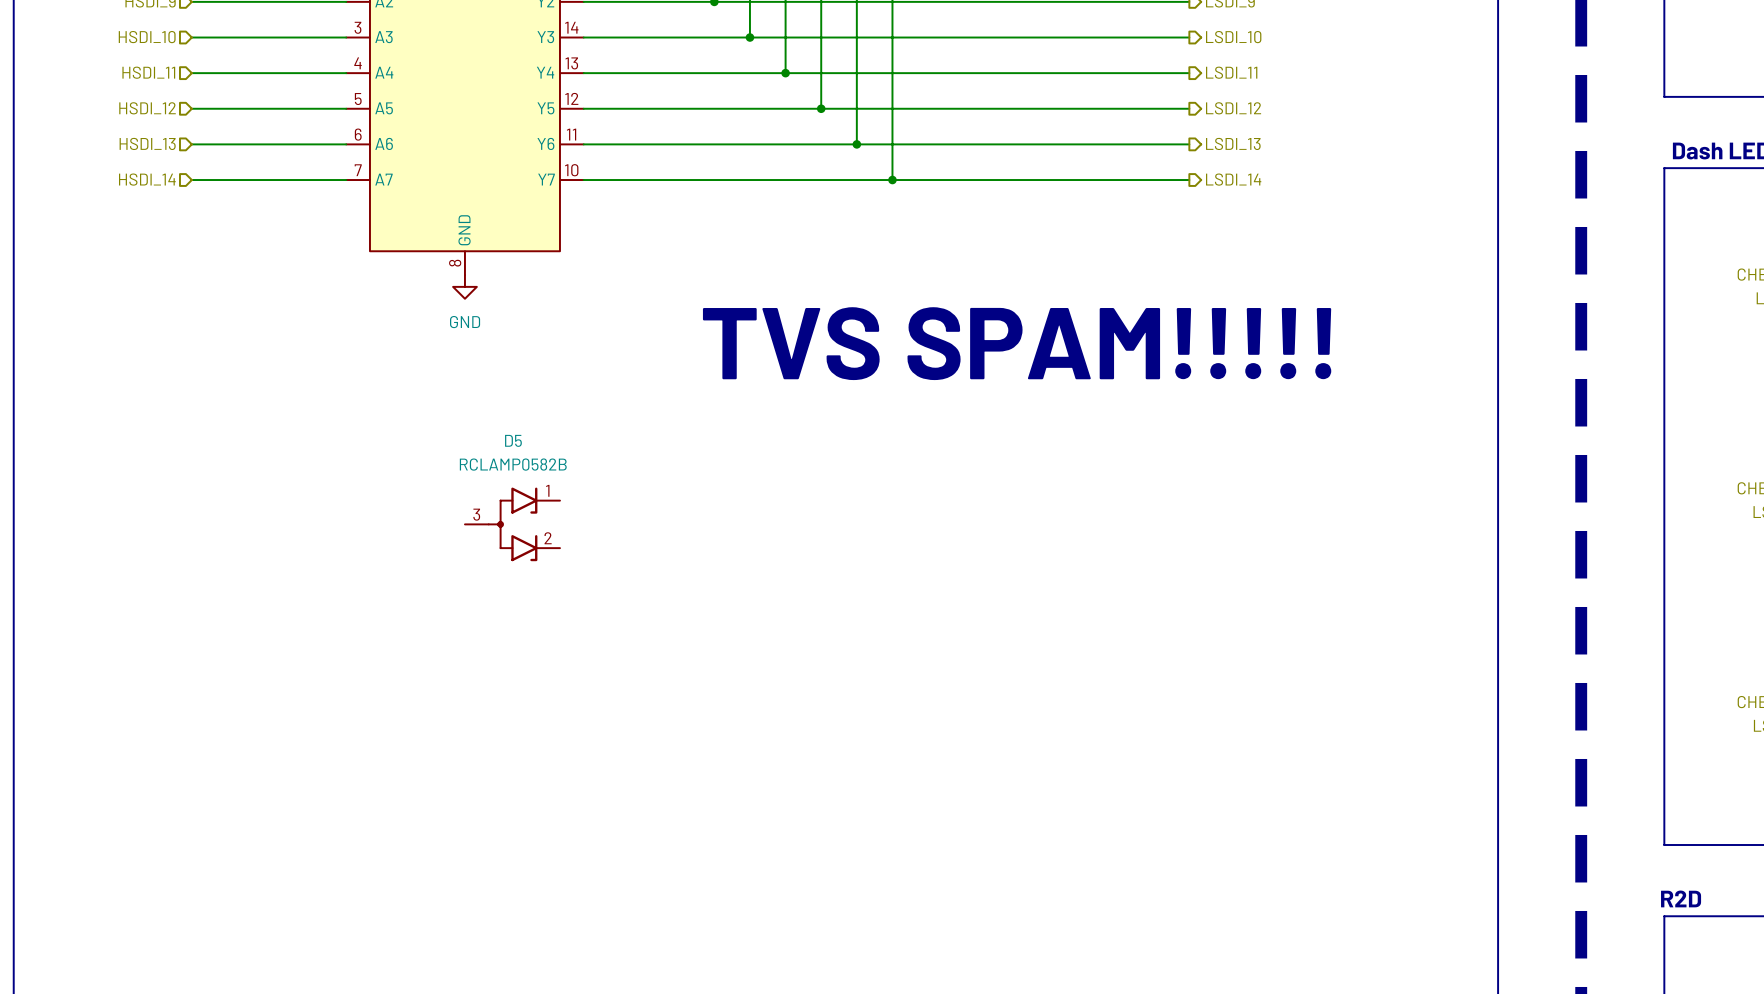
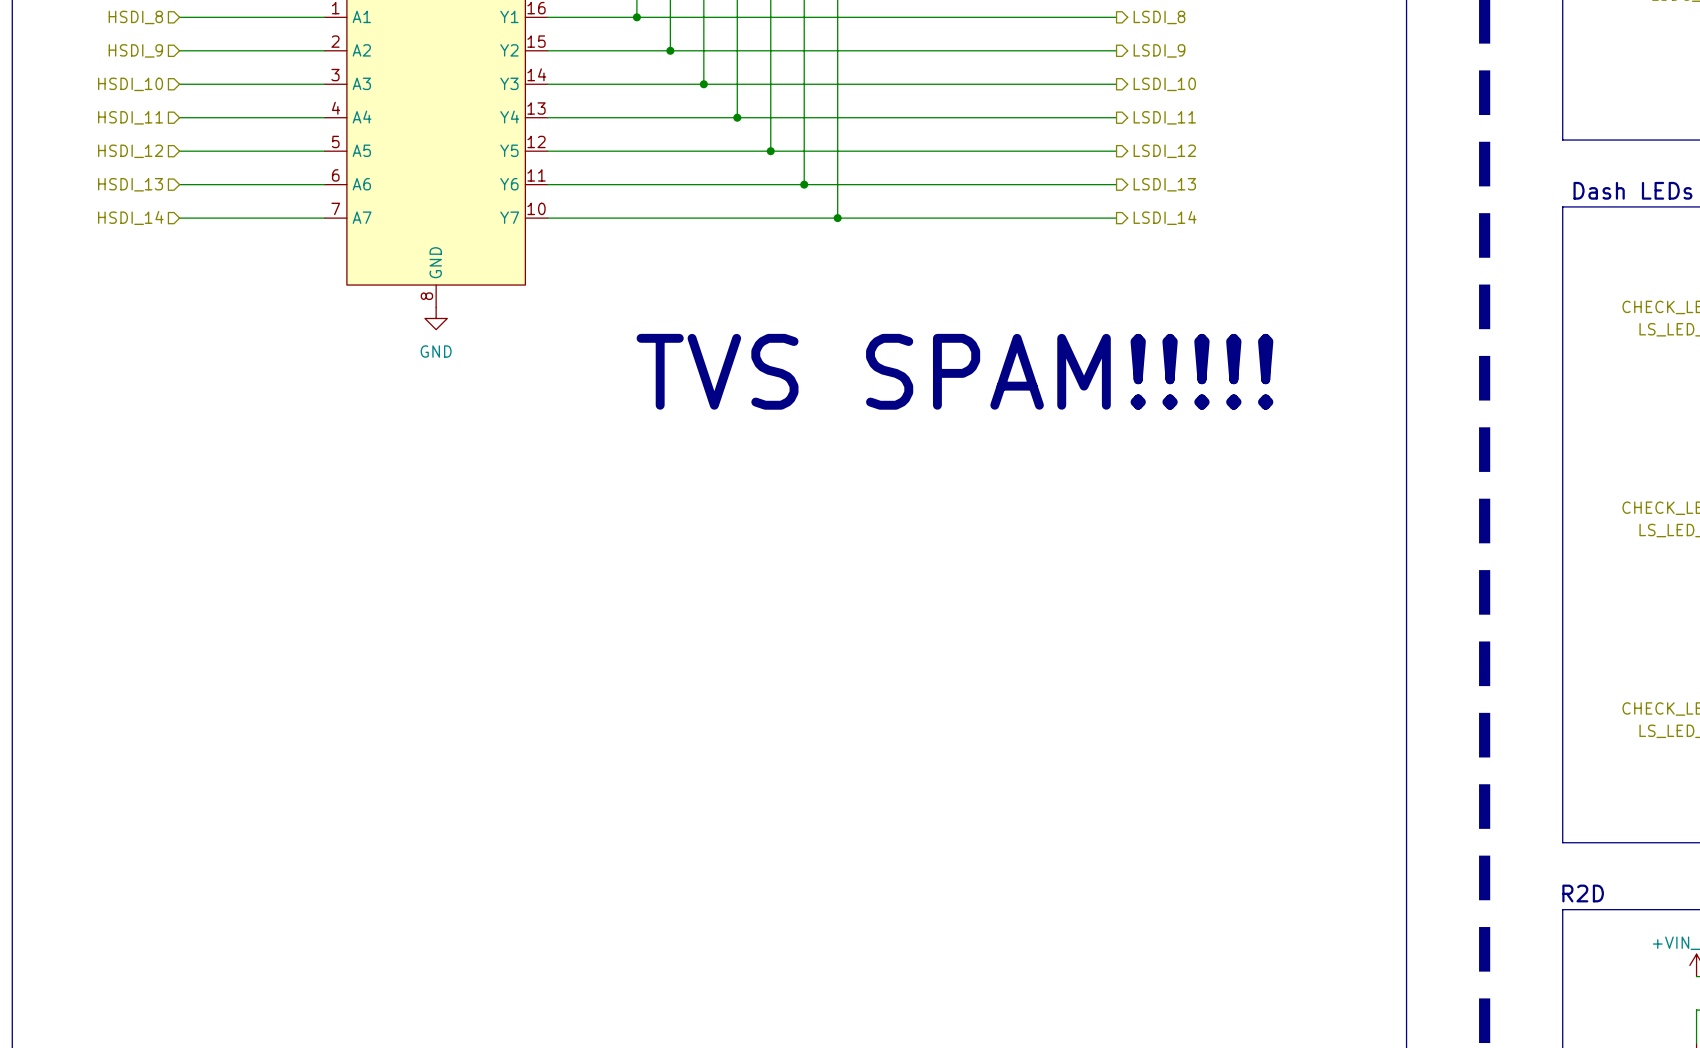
D5: RCLAMP0582B (512, 524) -> none

